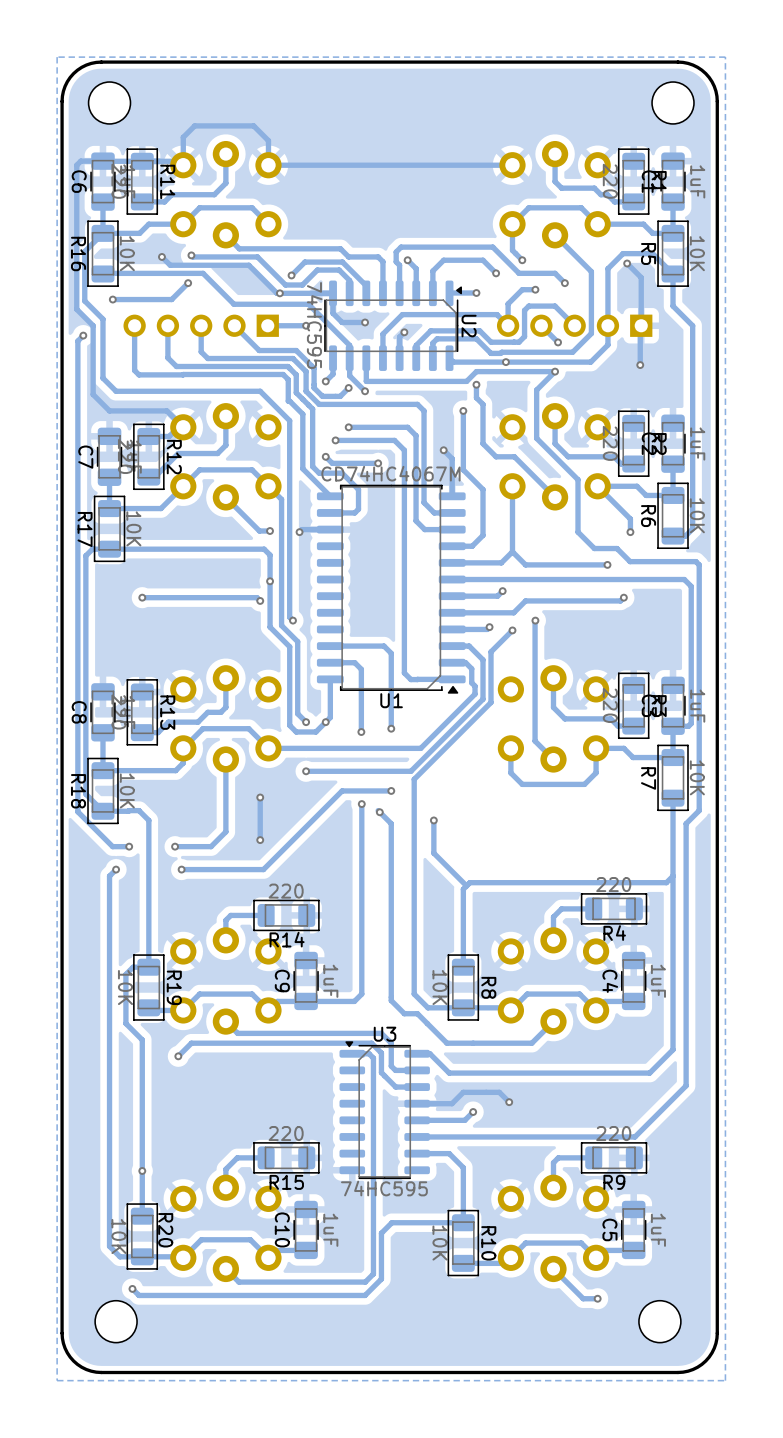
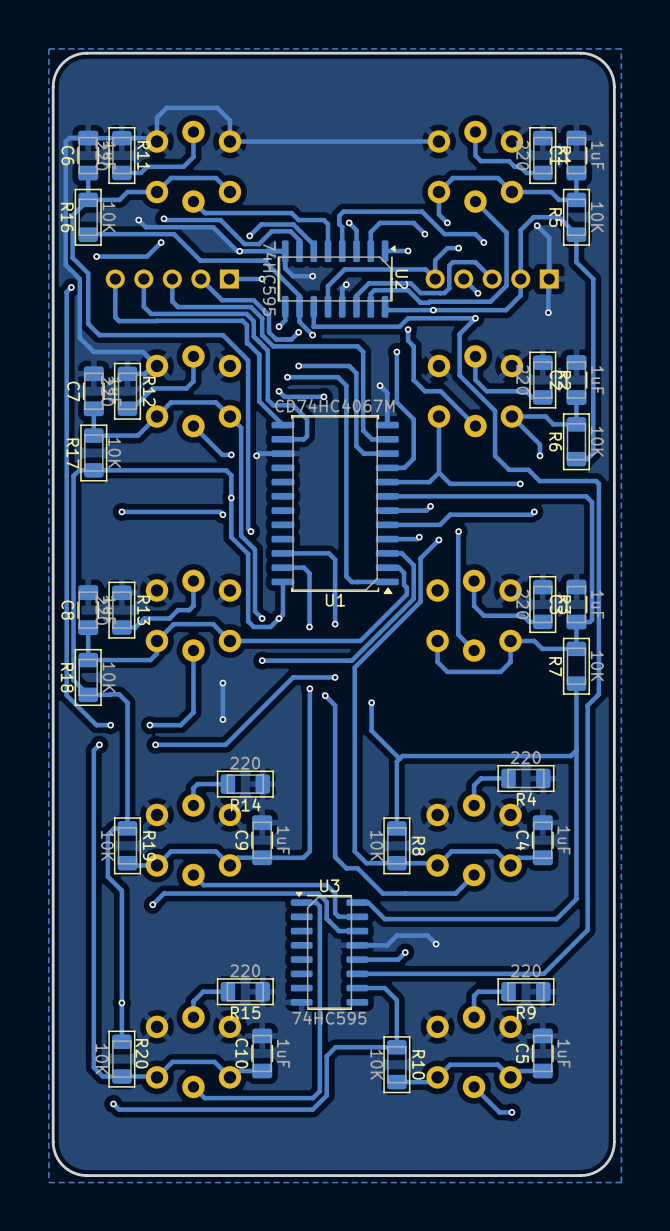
part: (109, 102) -> none
part: (673, 102) -> none
part: (116, 1321) -> none
part: (659, 1321) -> none

